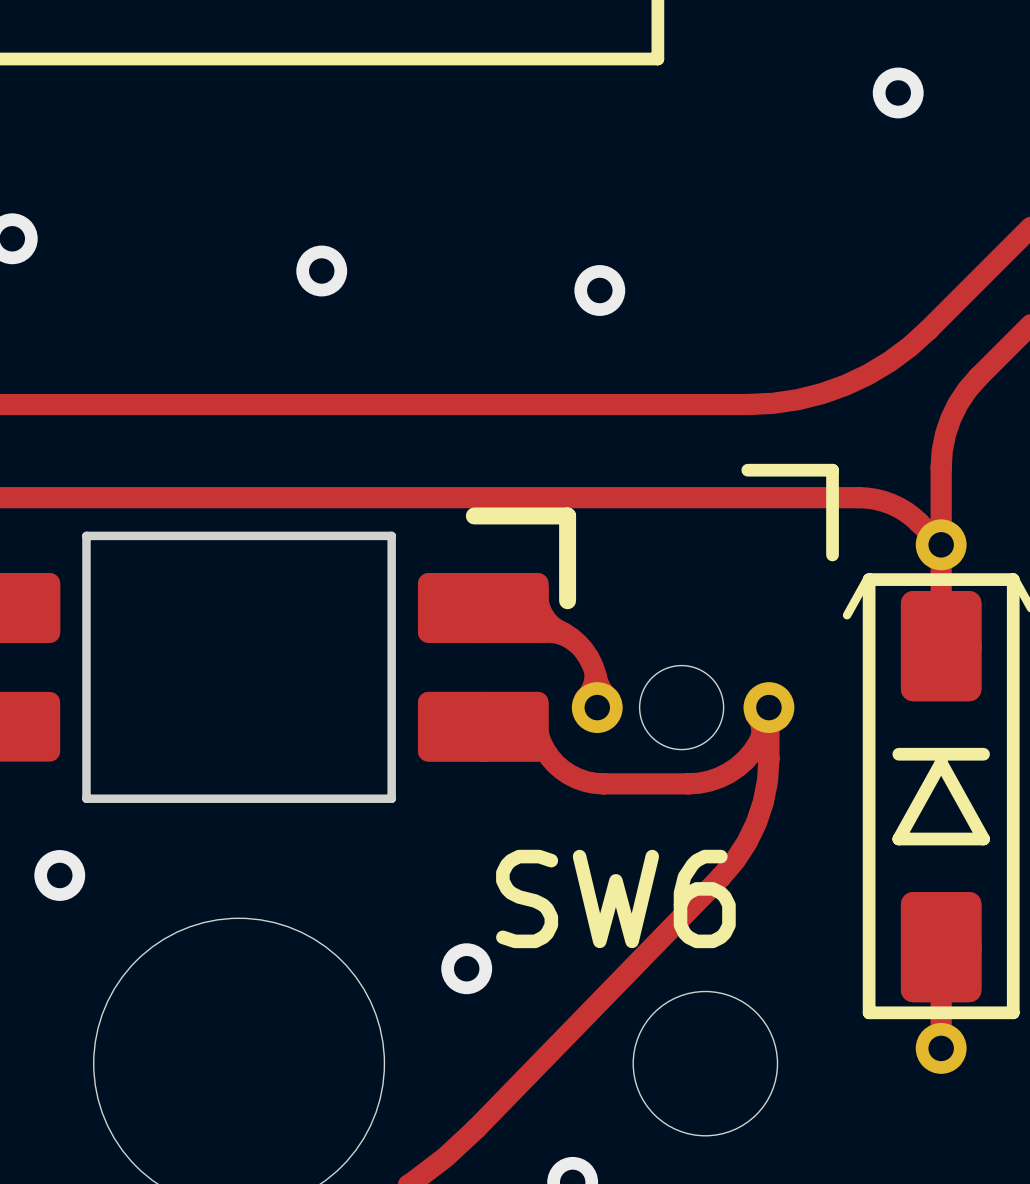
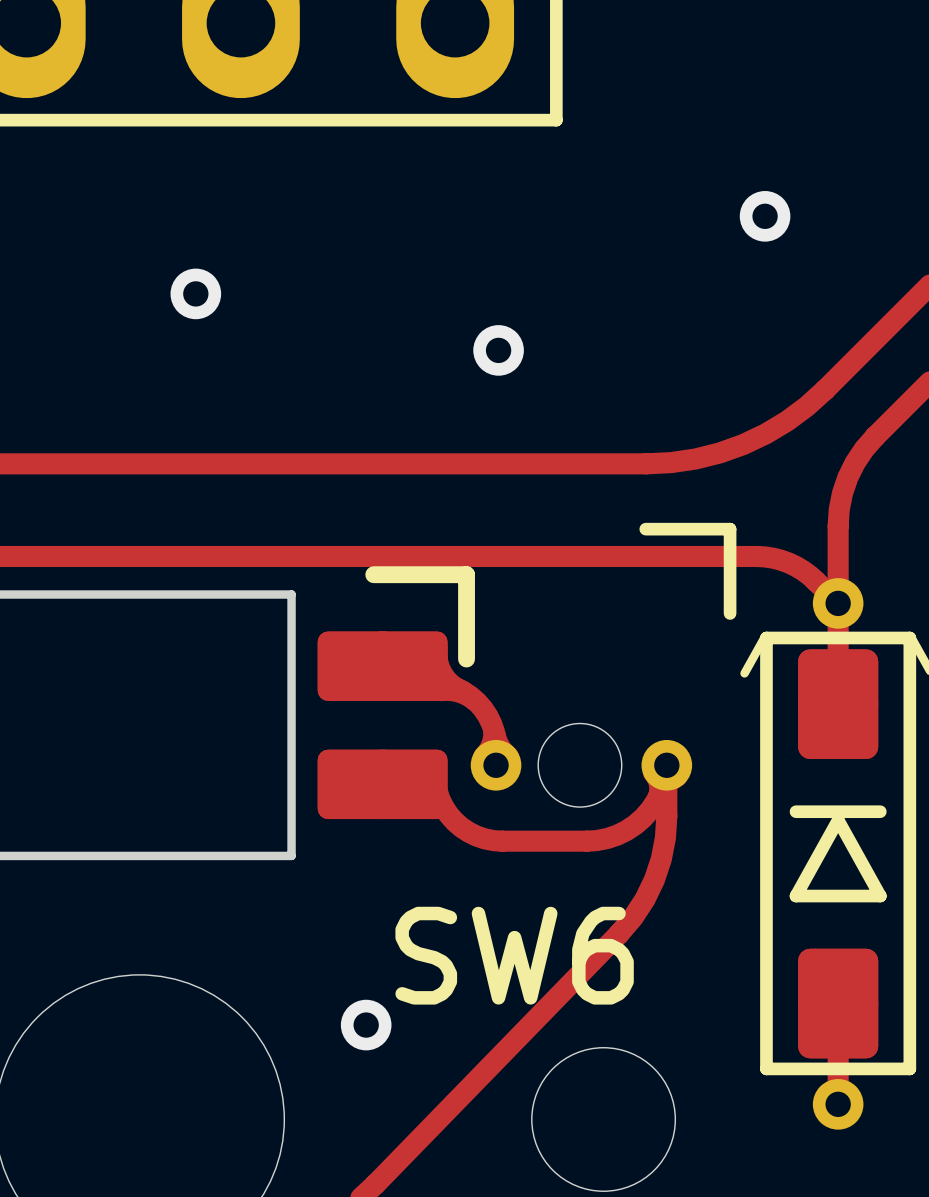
via position: (898, 92) -> (765, 216)
via position: (321, 271) -> (195, 293)

